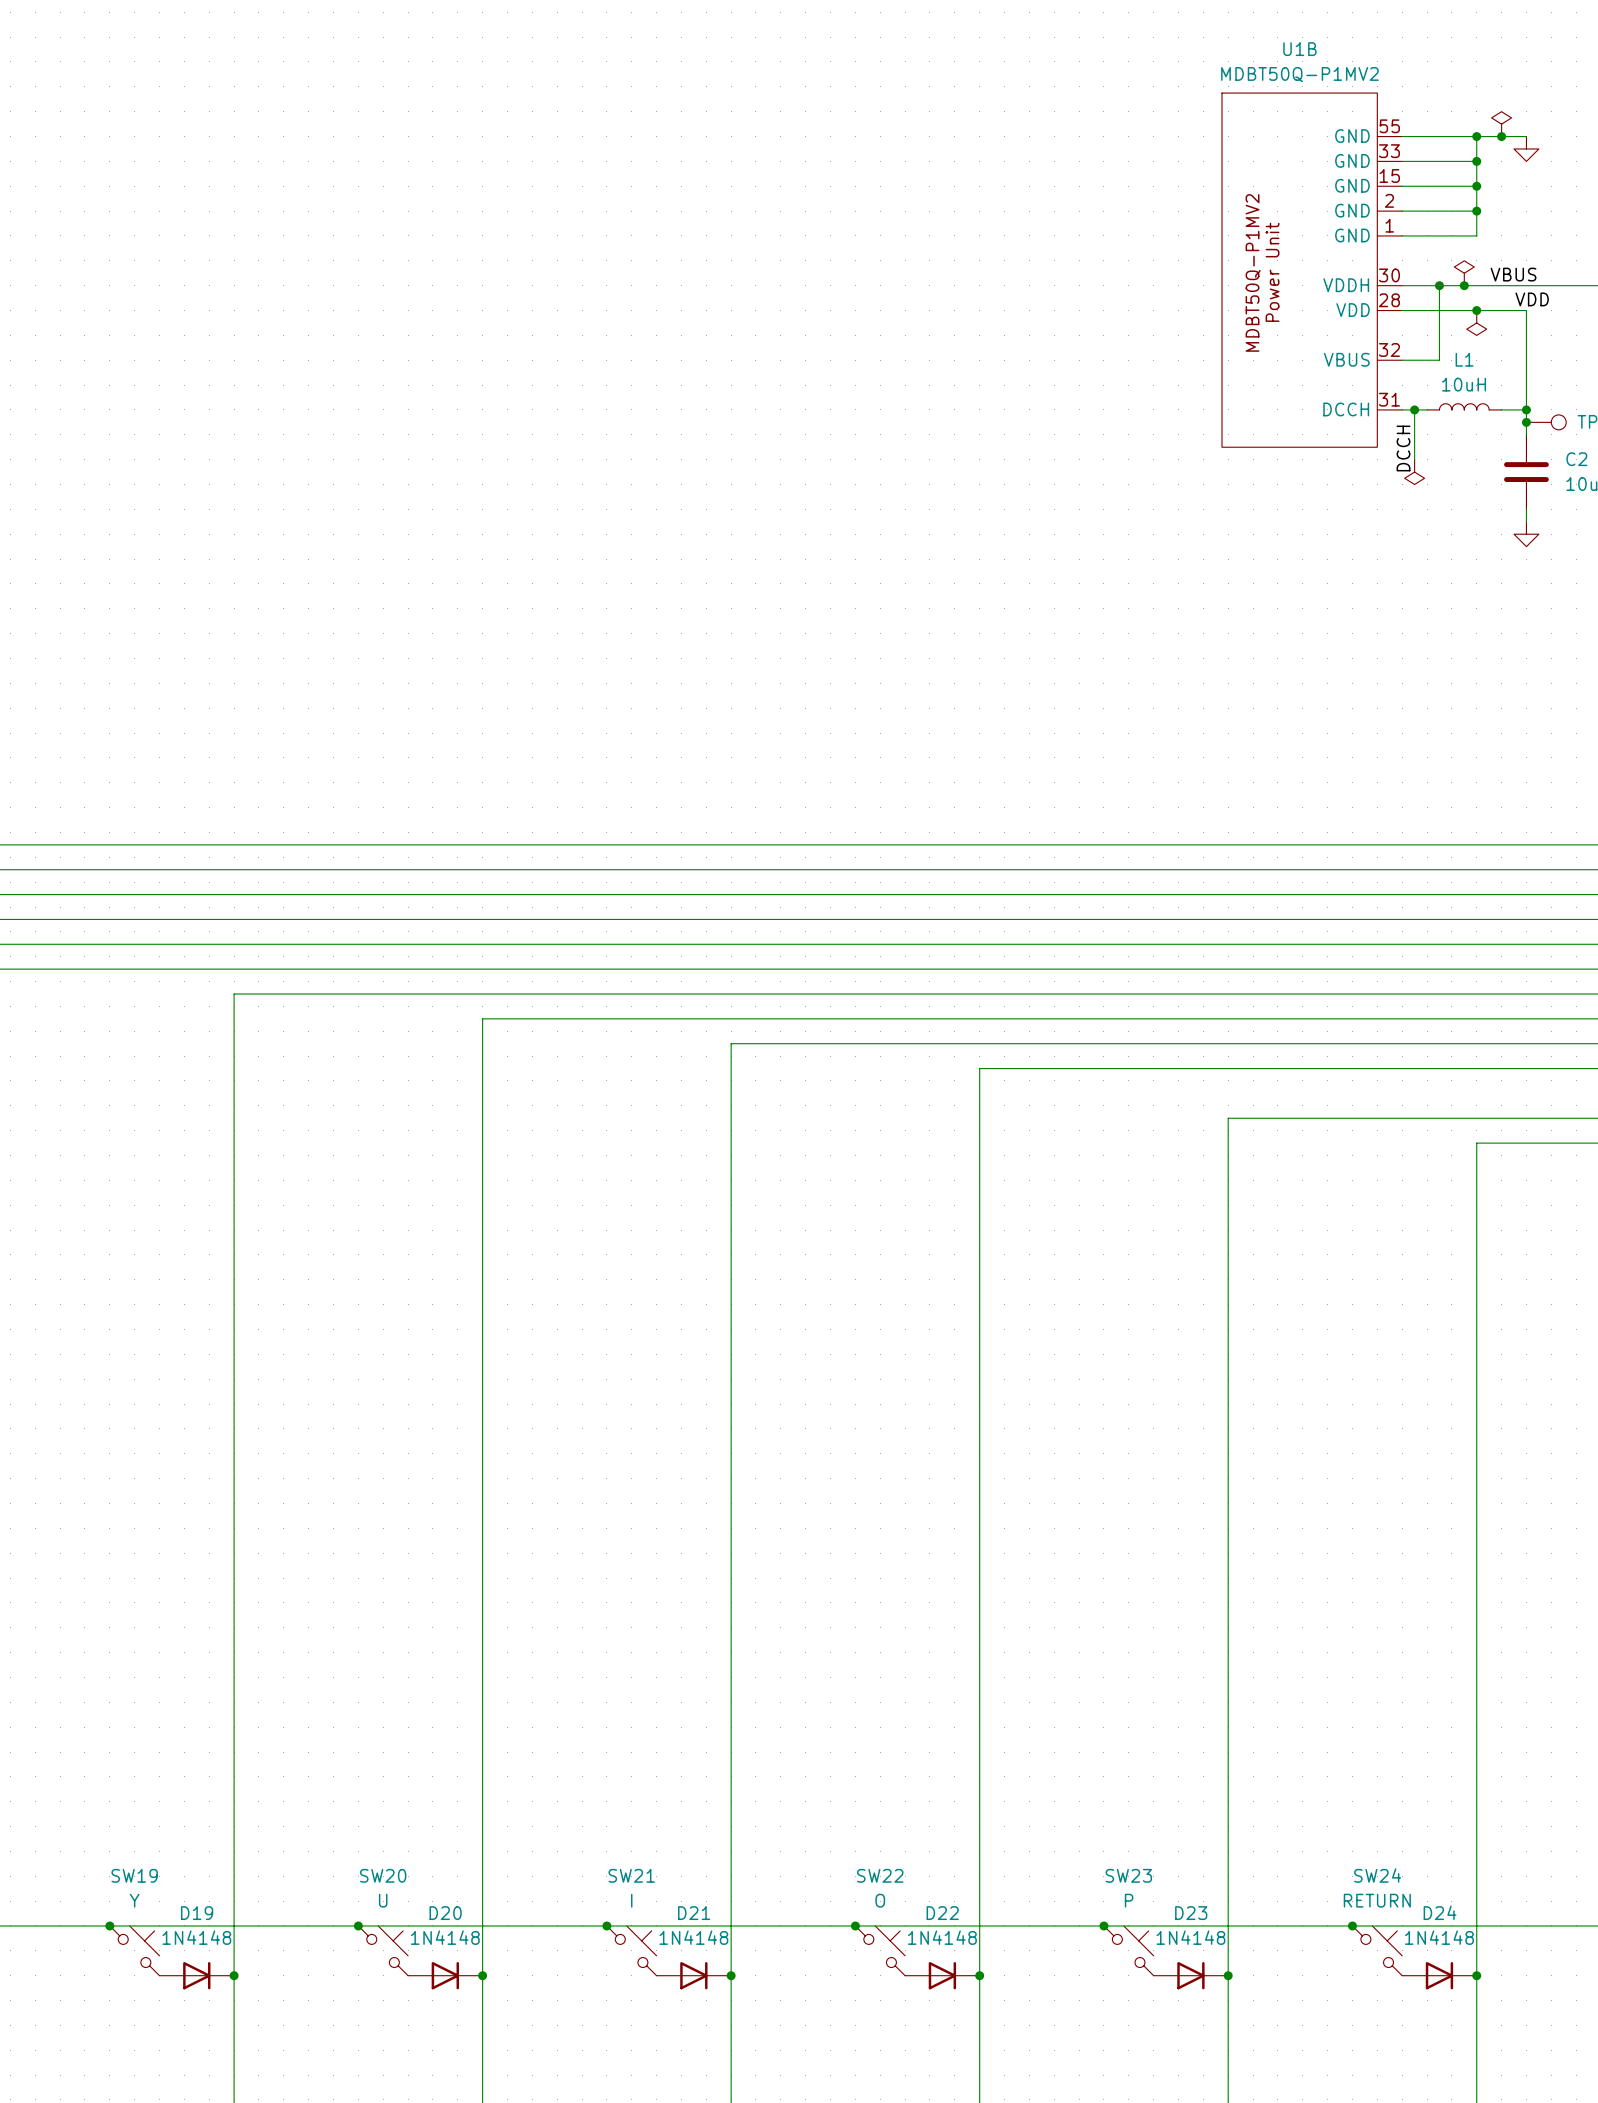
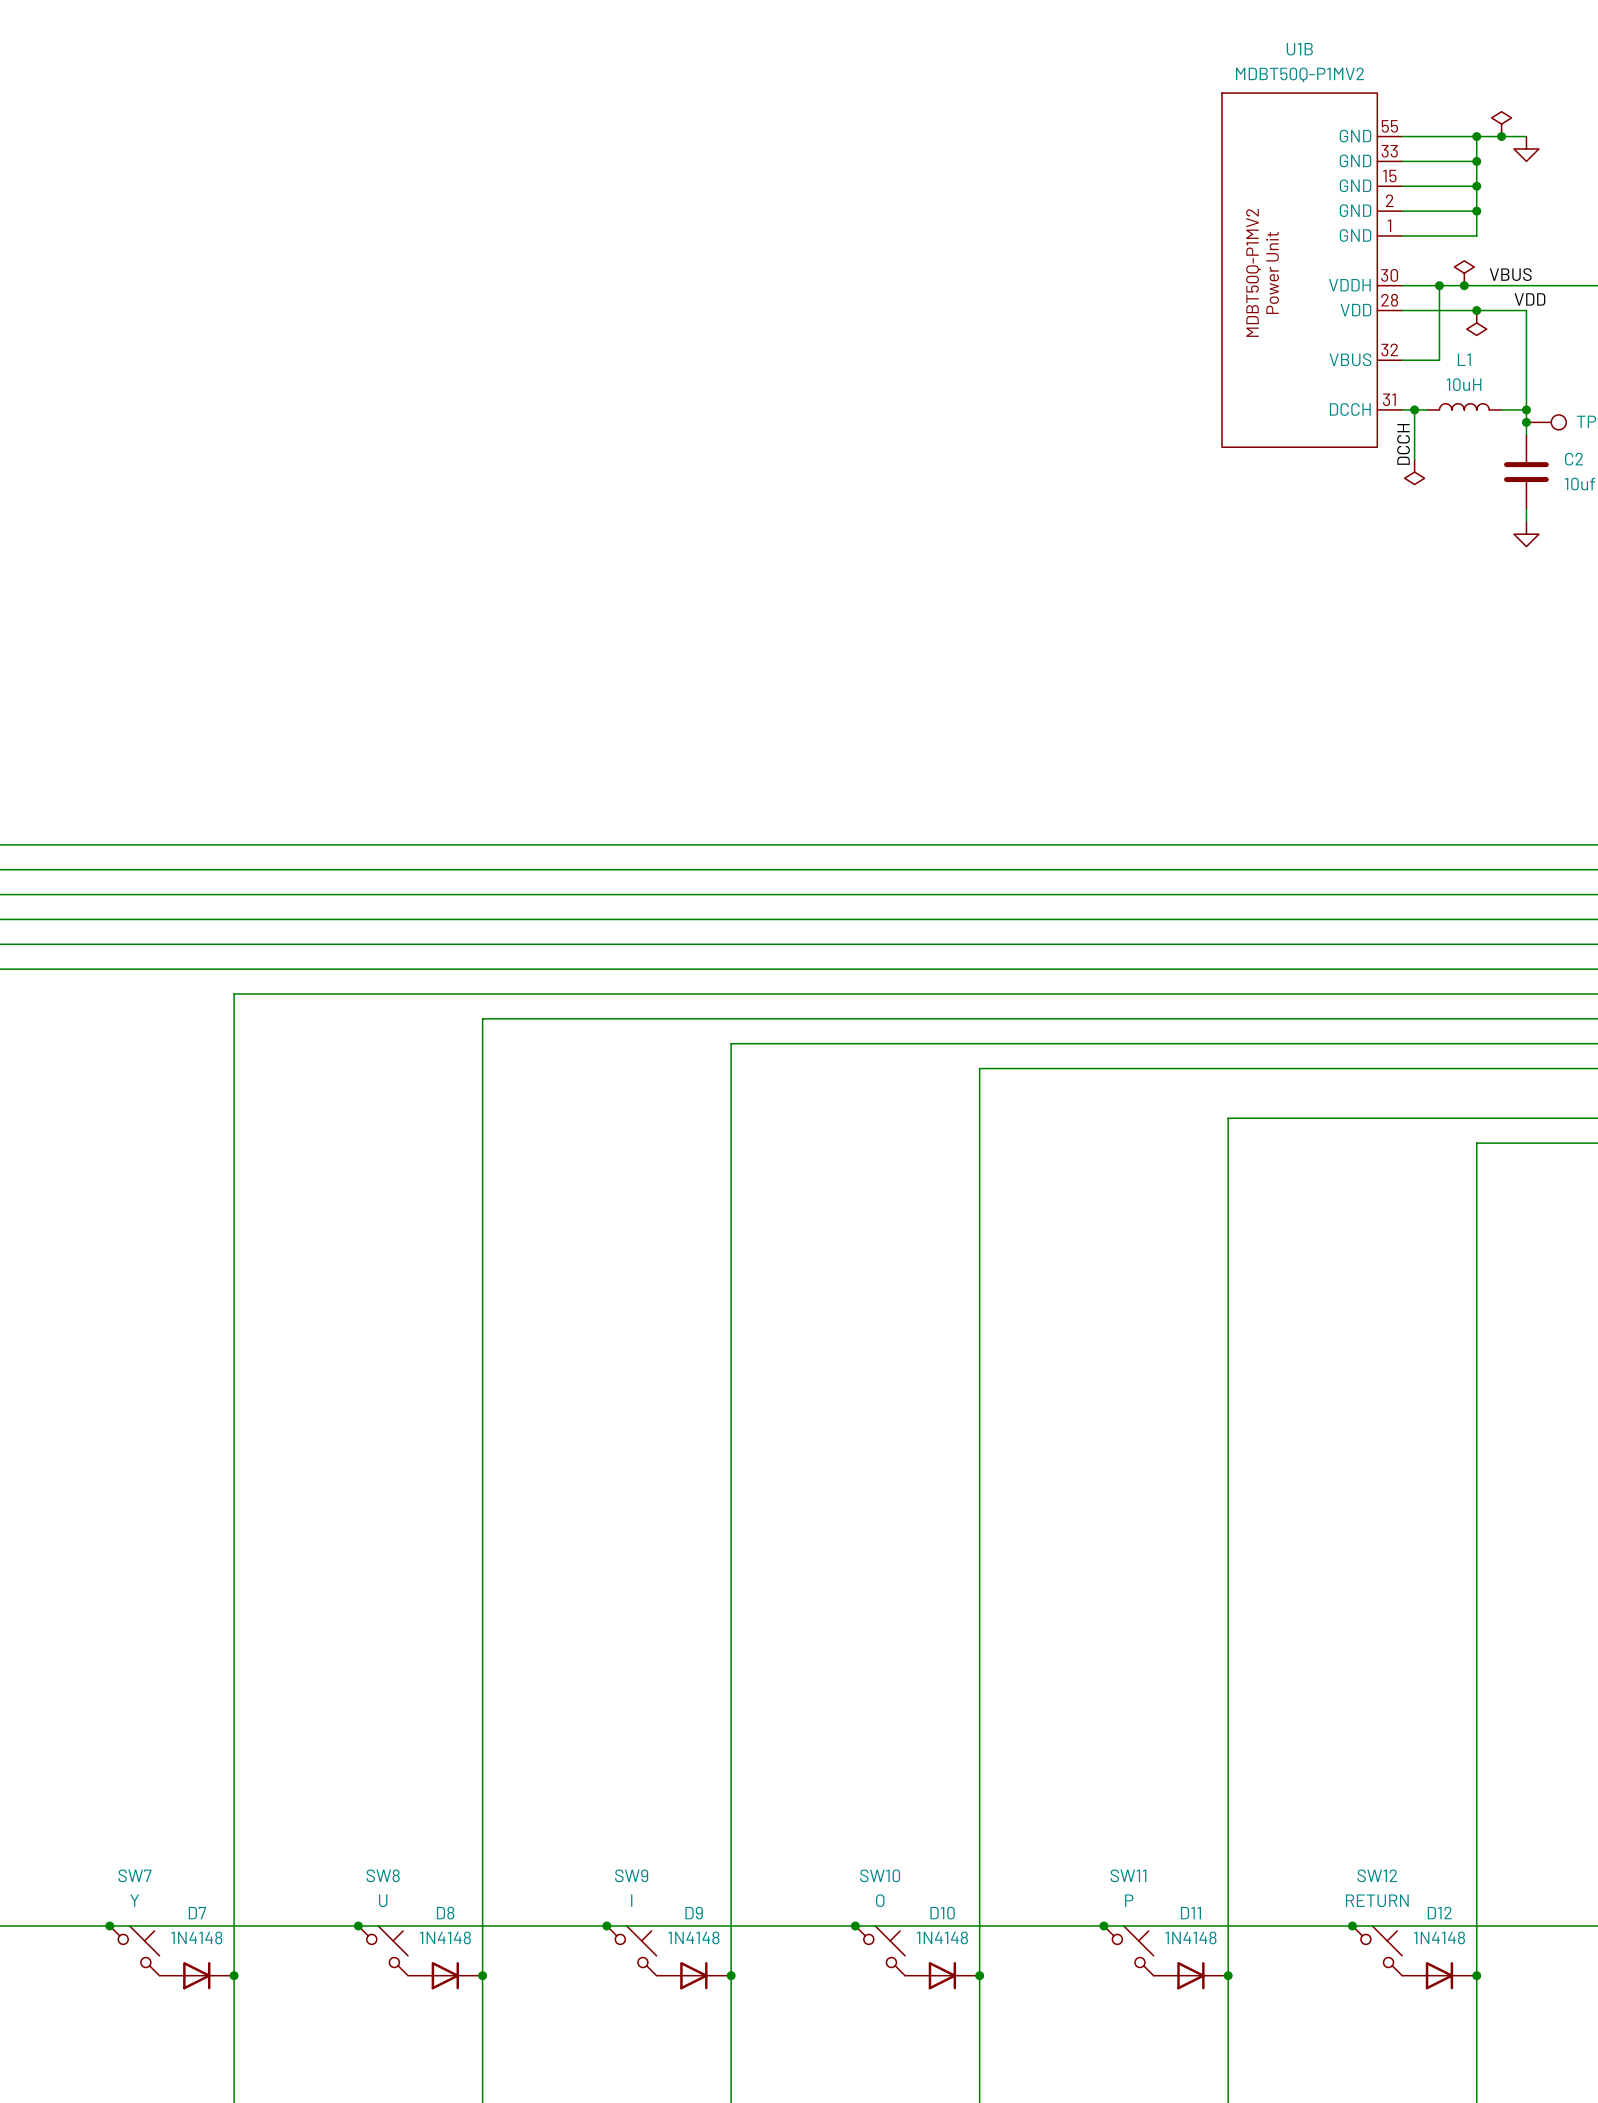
SW19 name: SW19 (134, 1875) -> SW7 (134, 1875)
SW20 name: SW20 (383, 1875) -> SW8 (383, 1875)
SW21 name: SW21 (631, 1875) -> SW9 (631, 1875)
SW22 name: SW22 (880, 1875) -> SW10 (880, 1875)
SW23 name: SW23 (1128, 1875) -> SW11 (1128, 1875)
SW24 name: SW24 (1377, 1875) -> SW12 (1377, 1875)
D24 name: D24 (1440, 1912) -> D12 (1439, 1913)
D19 name: D19 (197, 1913) -> D7 (197, 1913)
D20 name: D20 (445, 1913) -> D8 (445, 1913)
D21 name: D21 (694, 1913) -> D9 (694, 1913)
D22 name: D22 (942, 1913) -> D10 (942, 1913)
D23 name: D23 (1191, 1913) -> D11 (1190, 1913)

